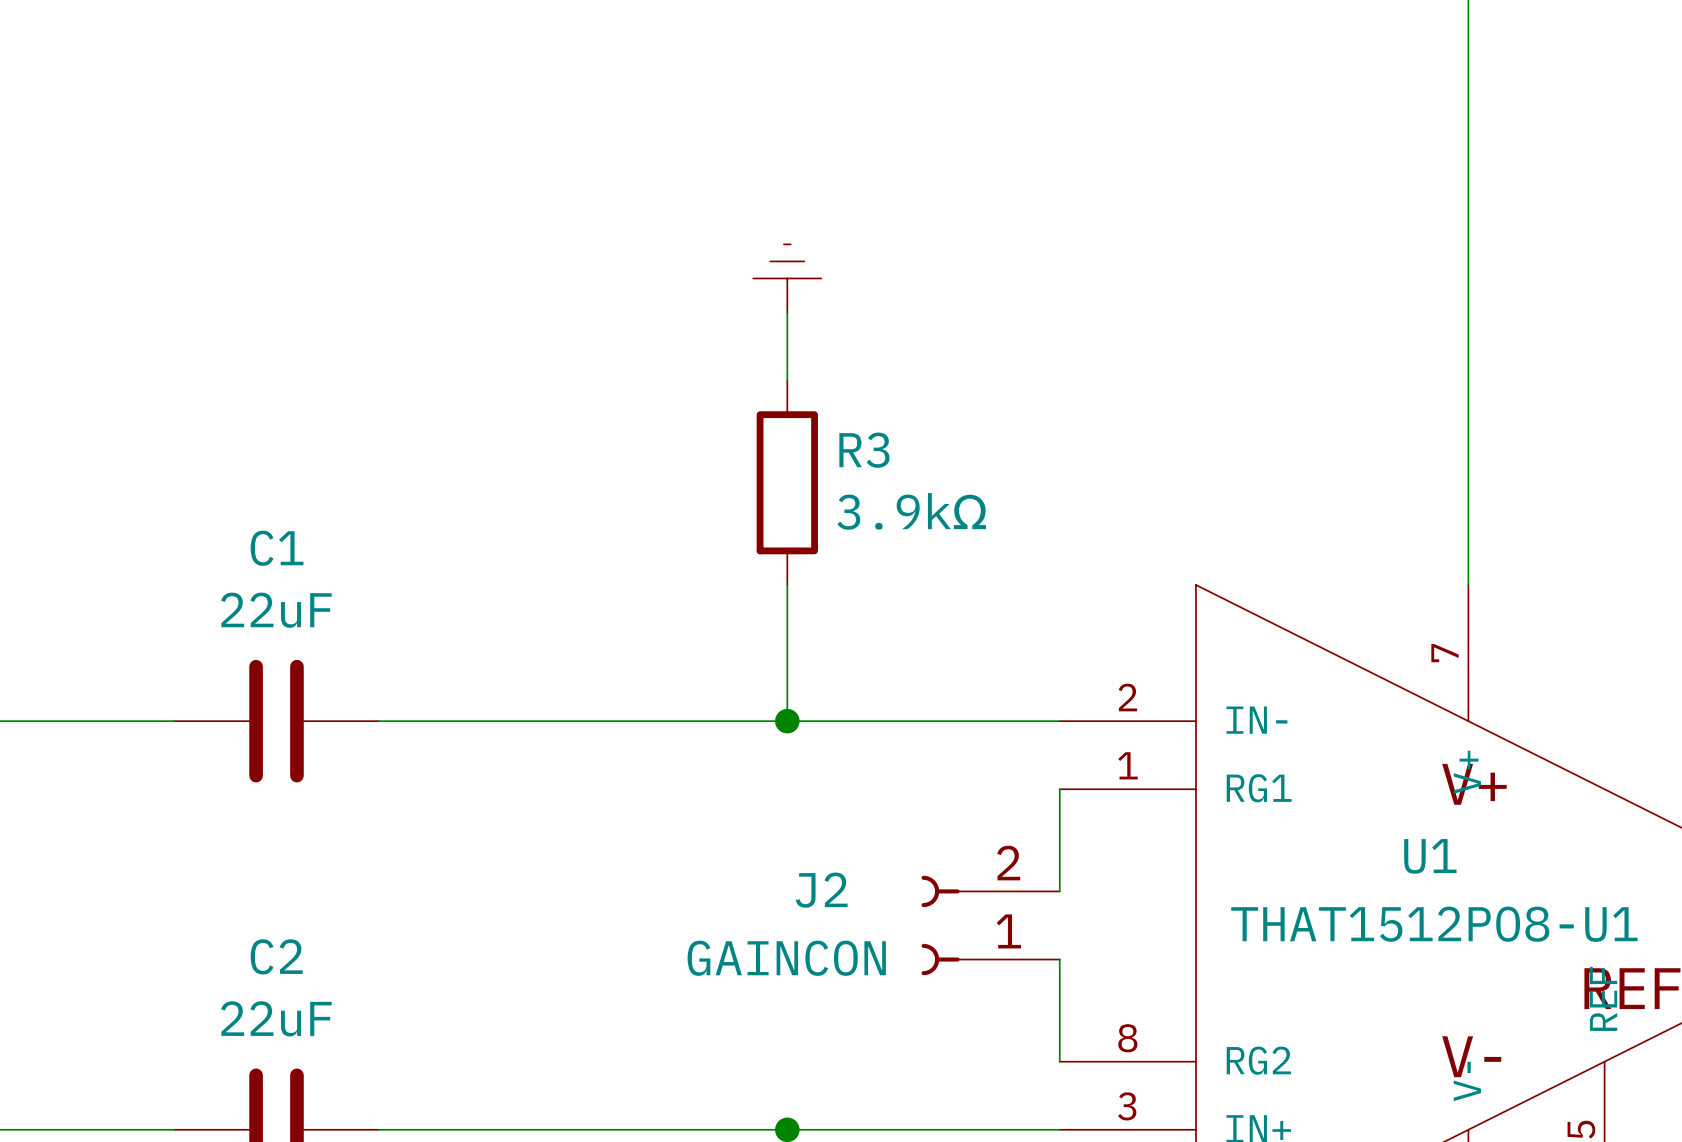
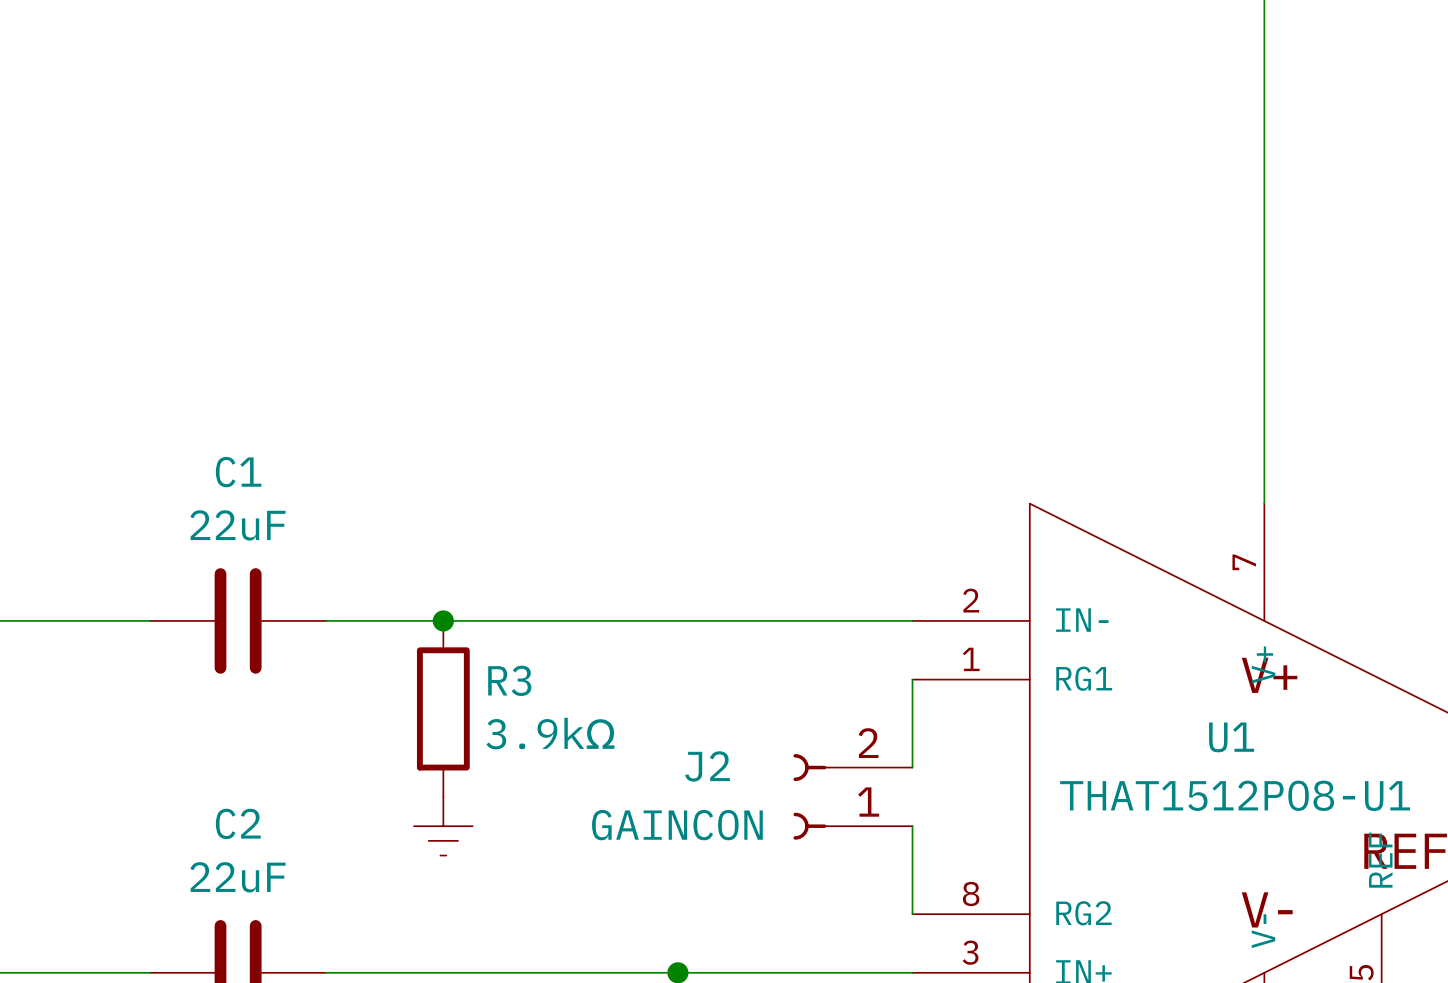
power symbol: (787, 278) -> none
wire: (787, 312) (787, 380) -> none
R3 position: (787, 482) -> (443, 708)
wire: (787, 584) (787, 721) -> none
junction: none -> (443, 620)
junction: (787, 721) -> none
power symbol: none -> (443, 826)

